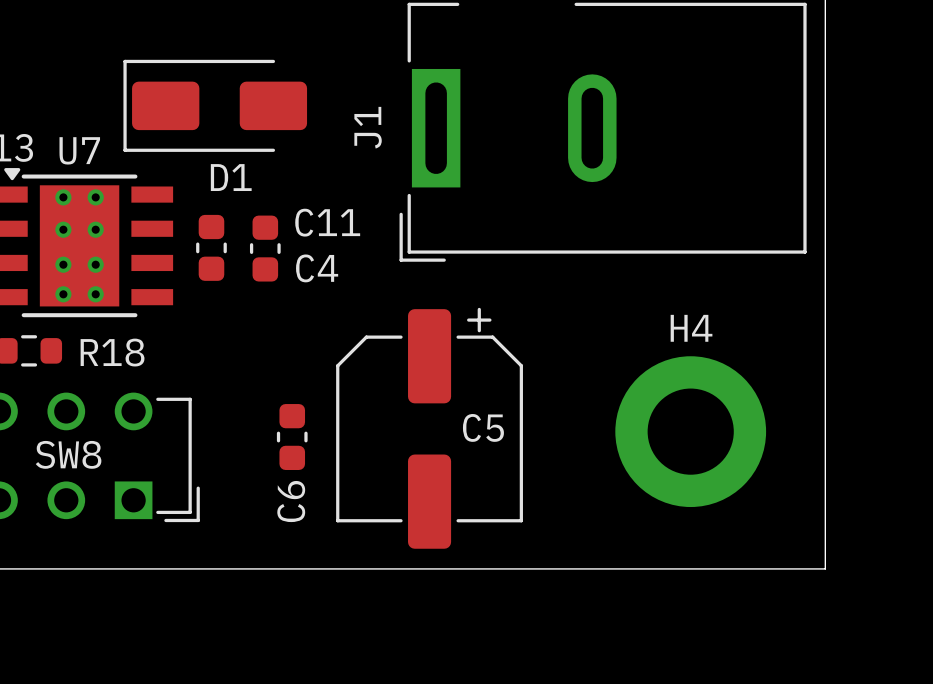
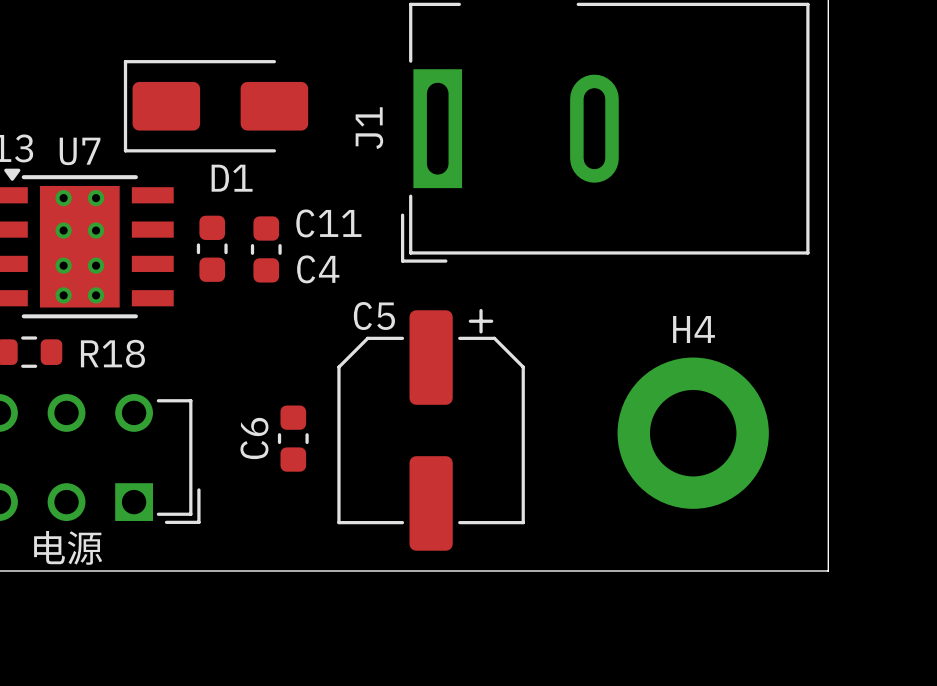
C5 name position: C5 (483, 427) -> C5 (374, 315)
SW8 name: SW8 (68, 454) -> 电源 (68, 547)
C6 name position: C6 (291, 501) -> C6 (254, 438)

